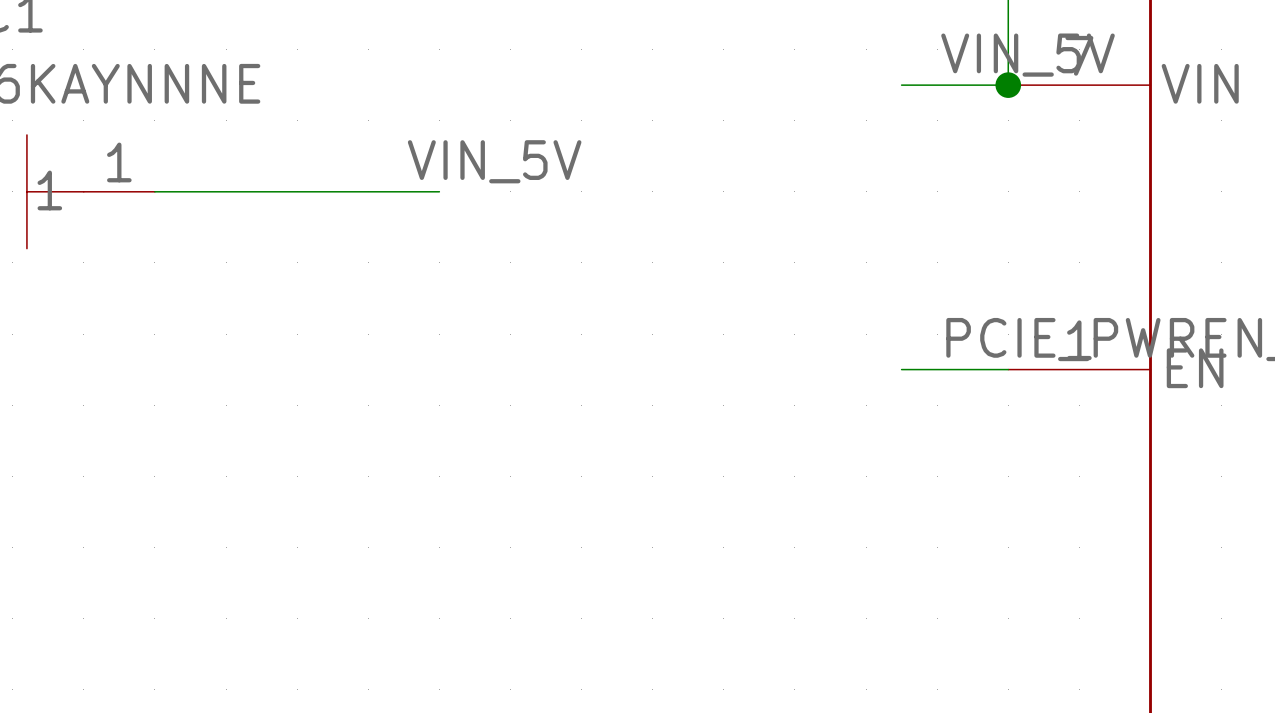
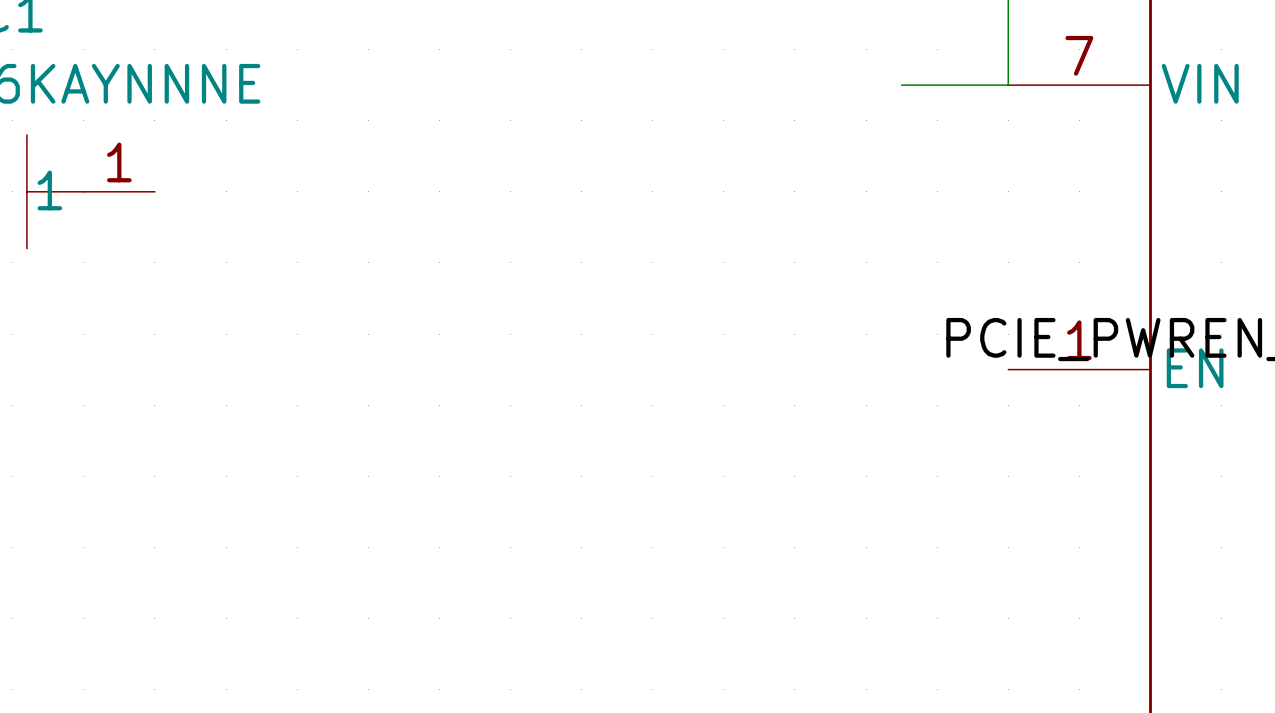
label: VIN_5V (1028, 55) -> none
junction: (1008, 85) -> none
label: VIN_5V (494, 161) -> none
wire: (154, 191) (439, 191) -> none
wire: (901, 369) (1008, 369) -> none

